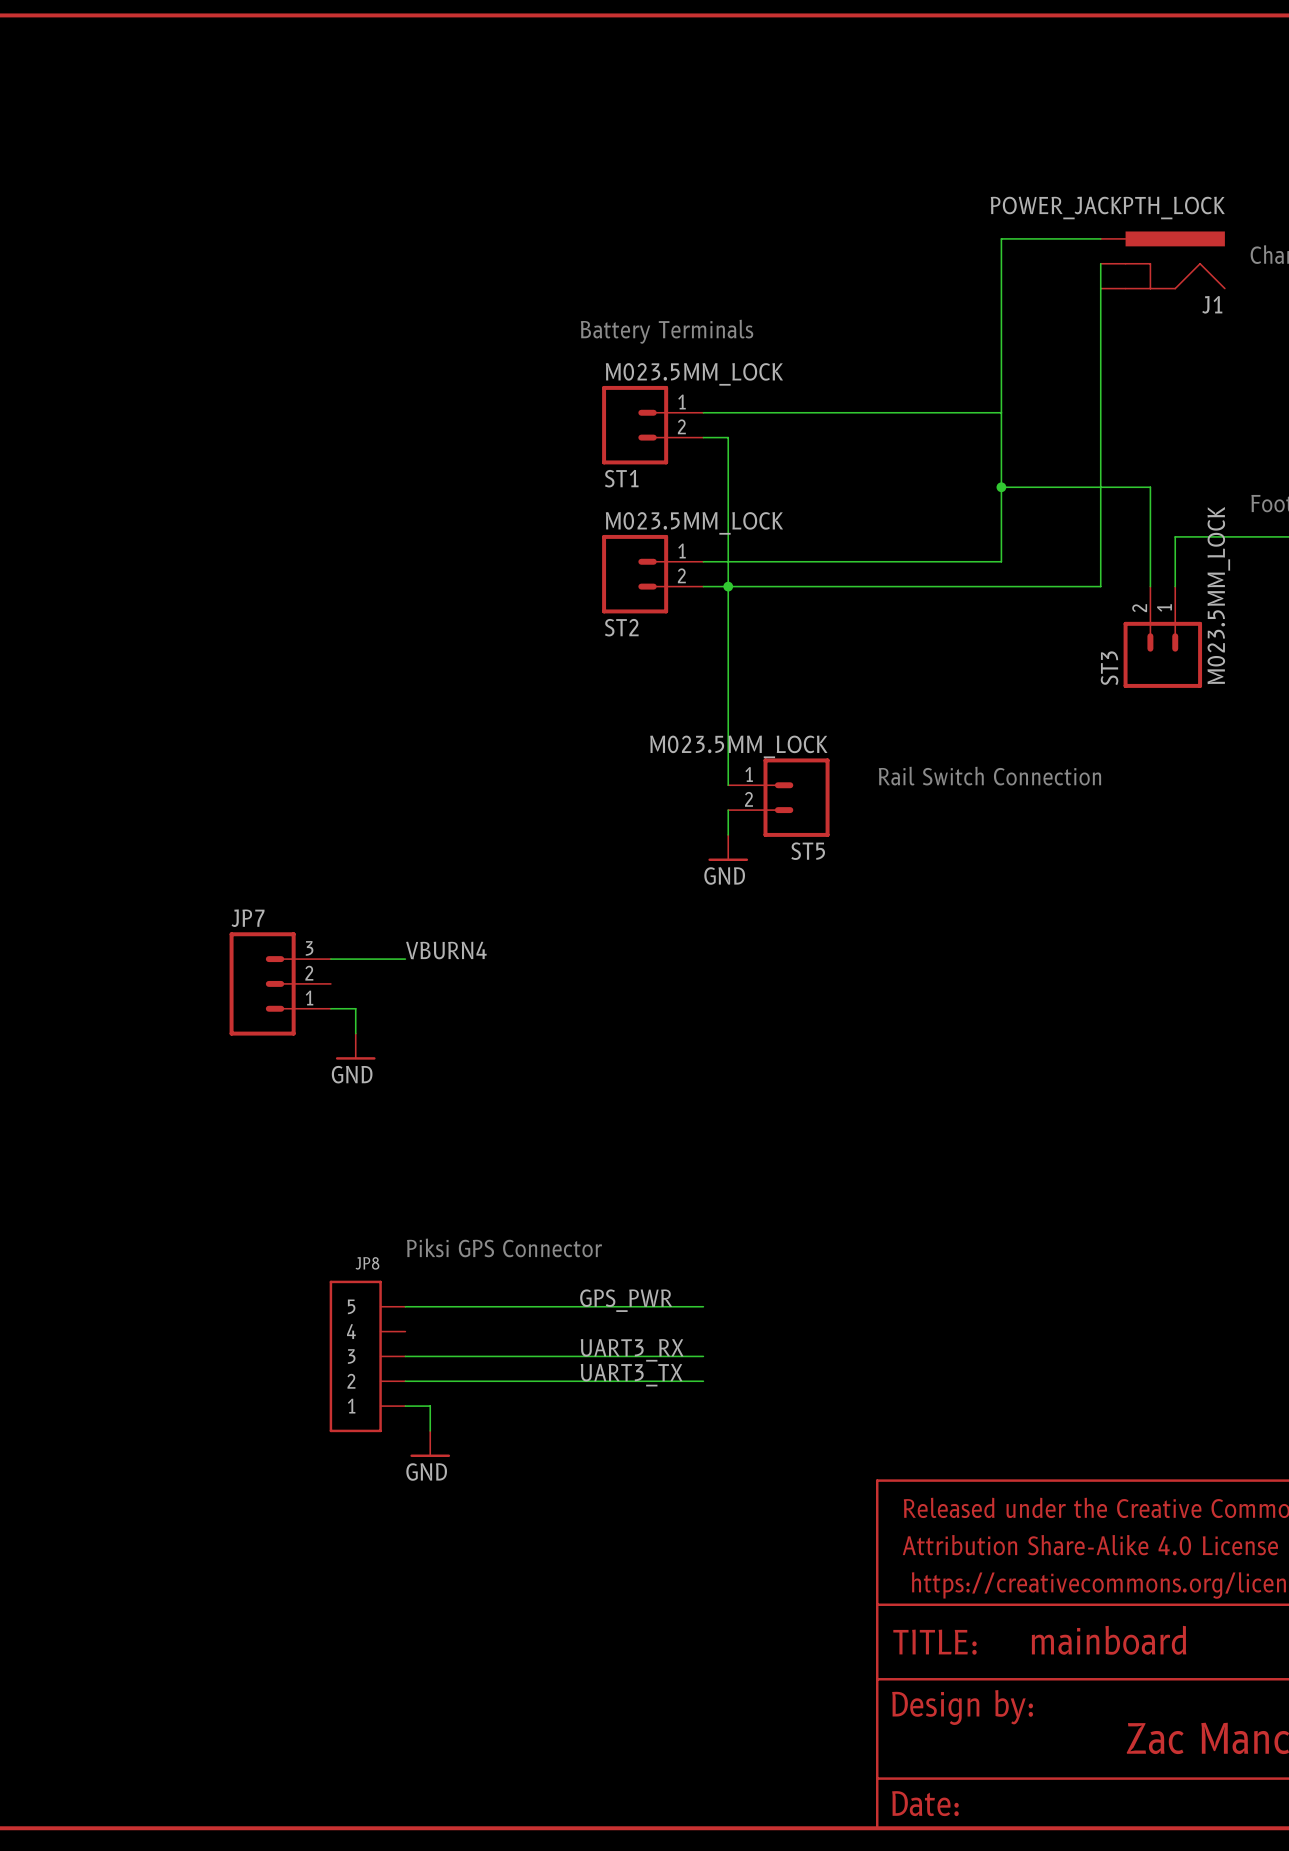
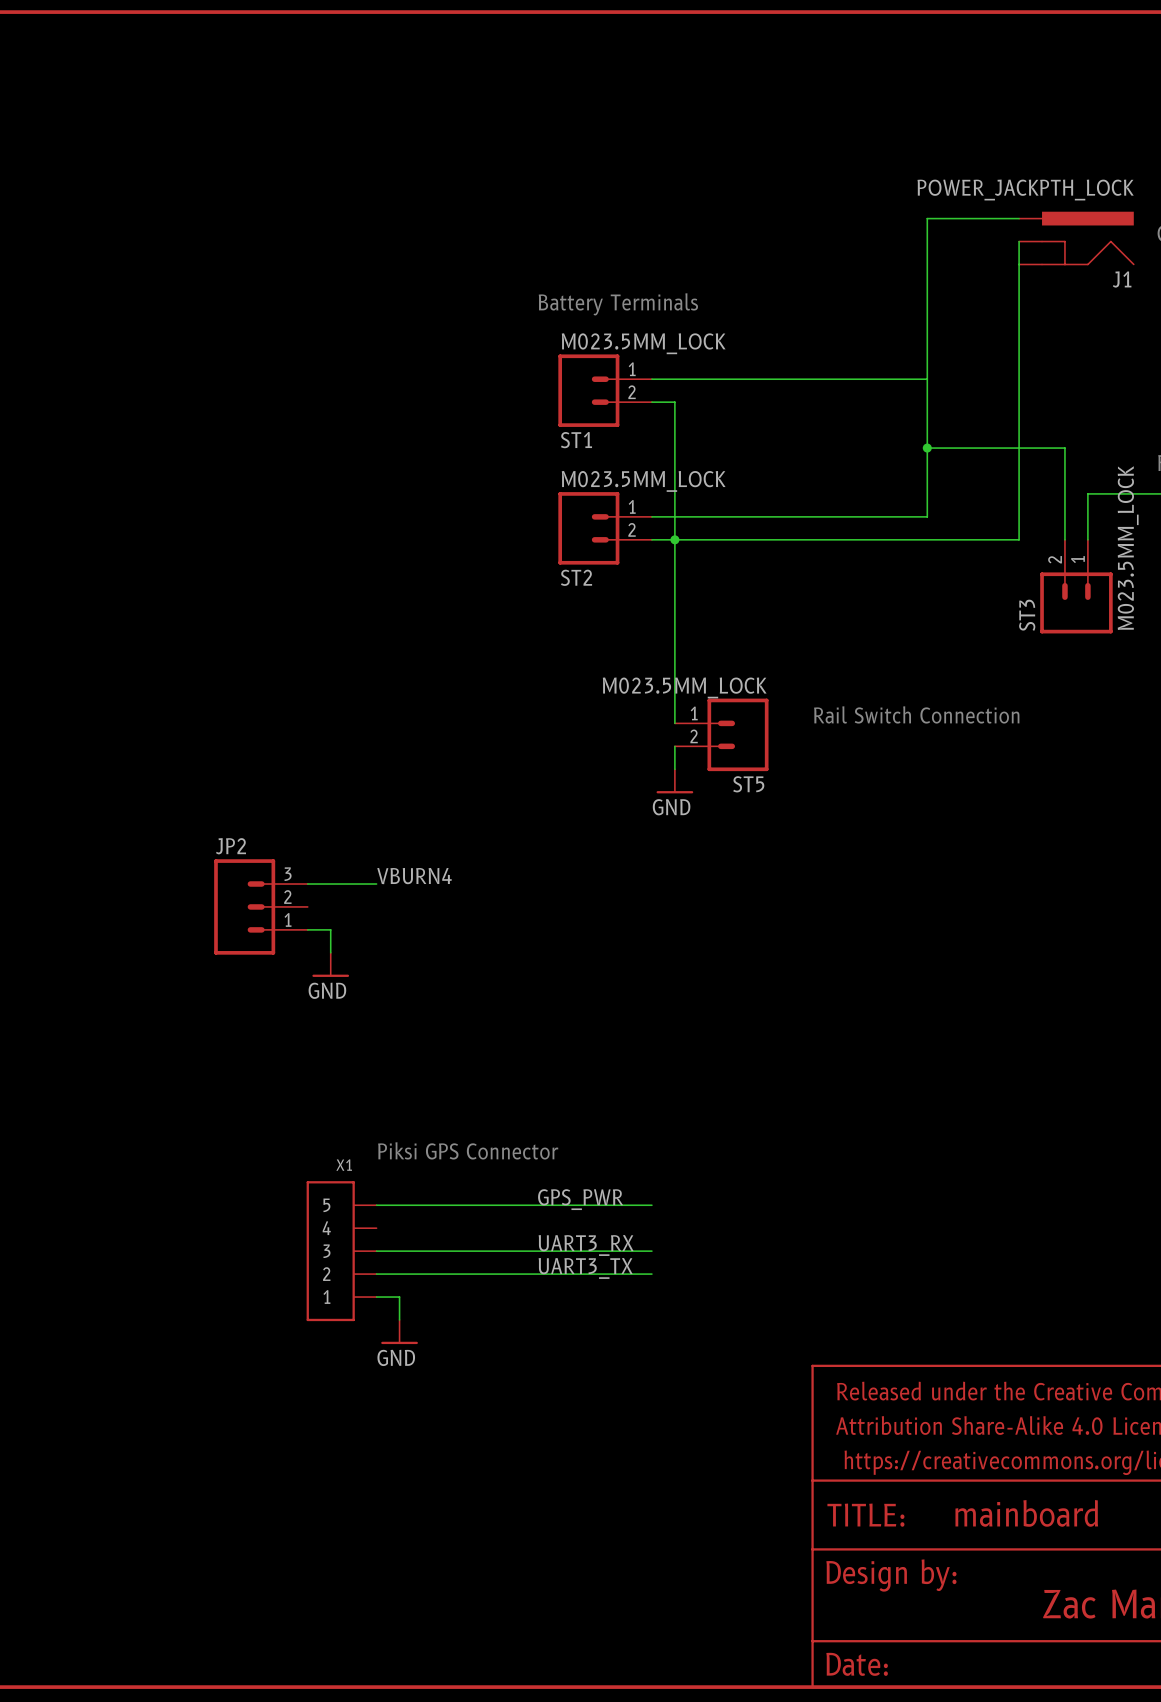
JP7 name: JP7 (248, 918) -> JP2 (231, 846)
JP8 name: JP8 (367, 1263) -> X1 (344, 1165)

